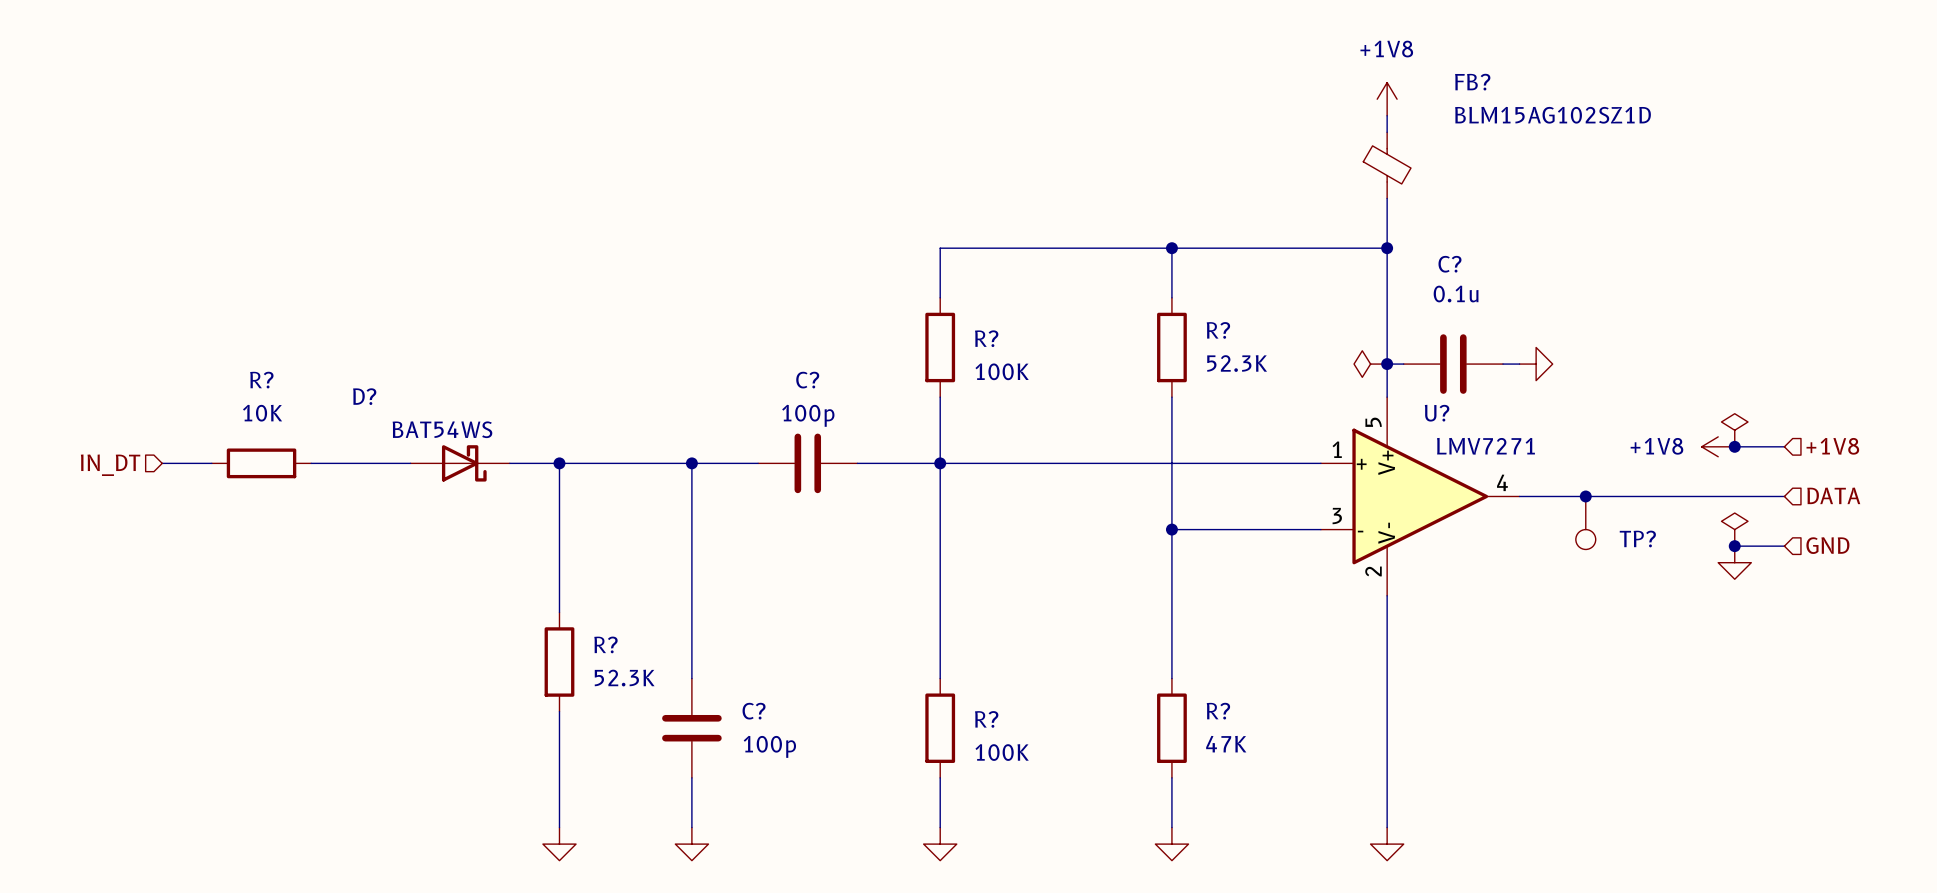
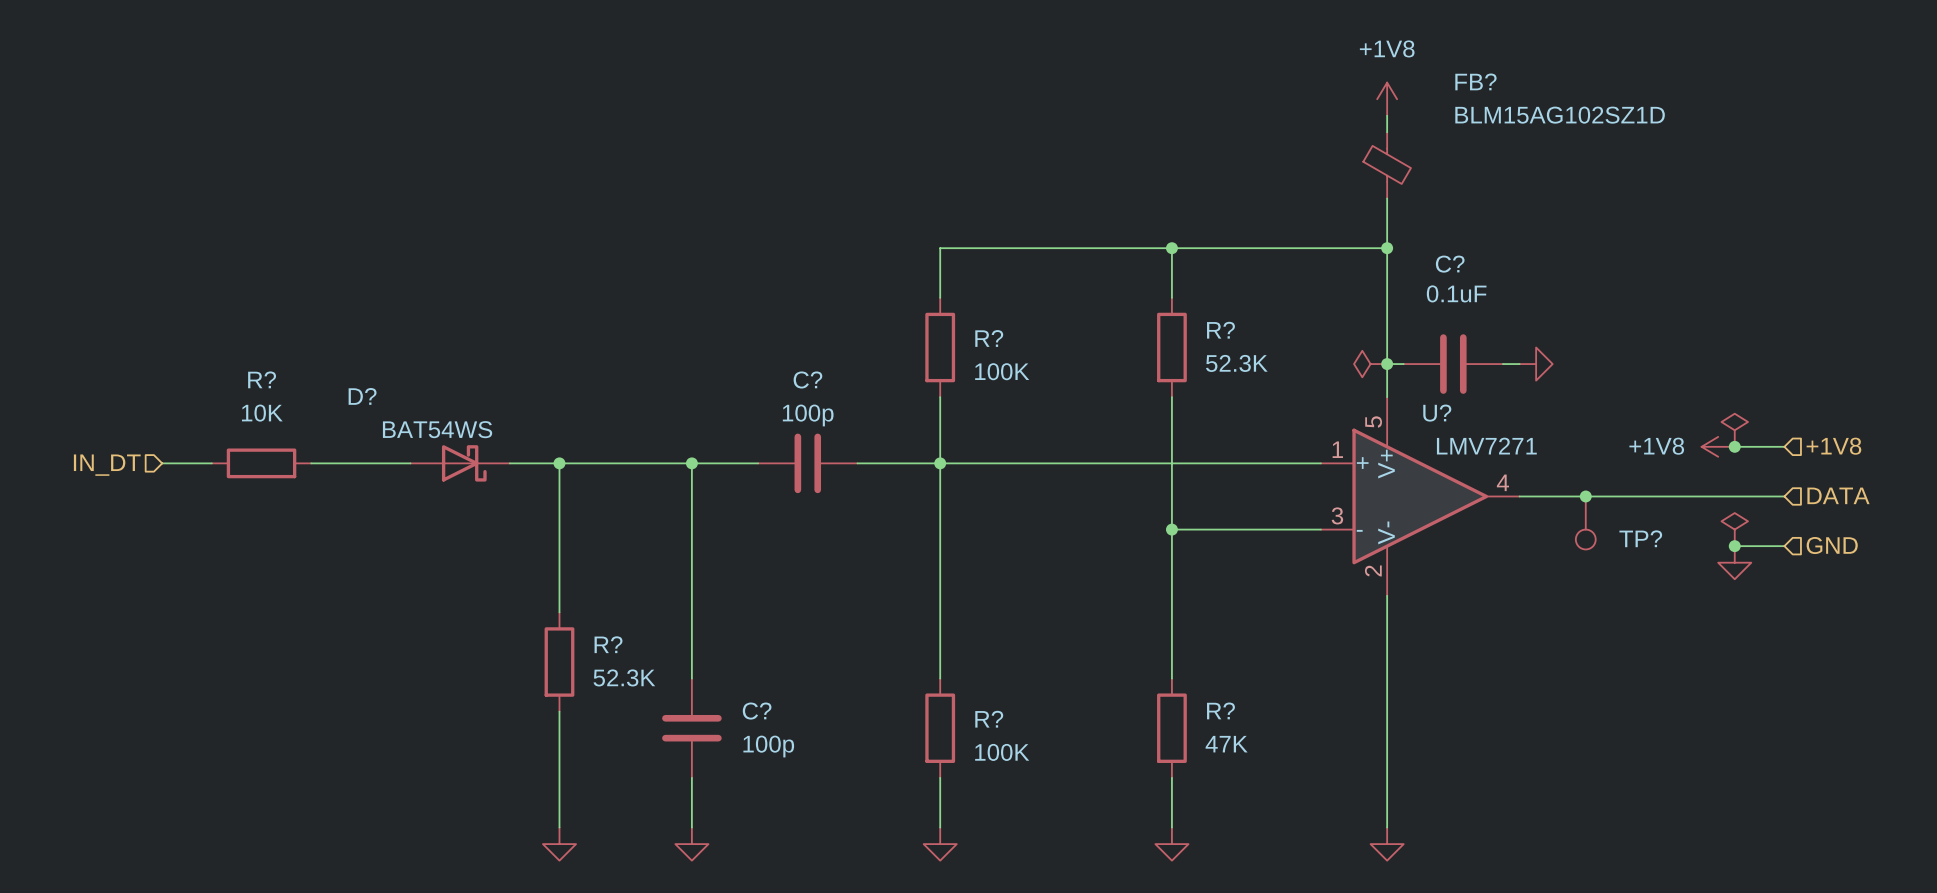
C? value: 0.1u (1456, 294) -> 0.1uF (1456, 293)

